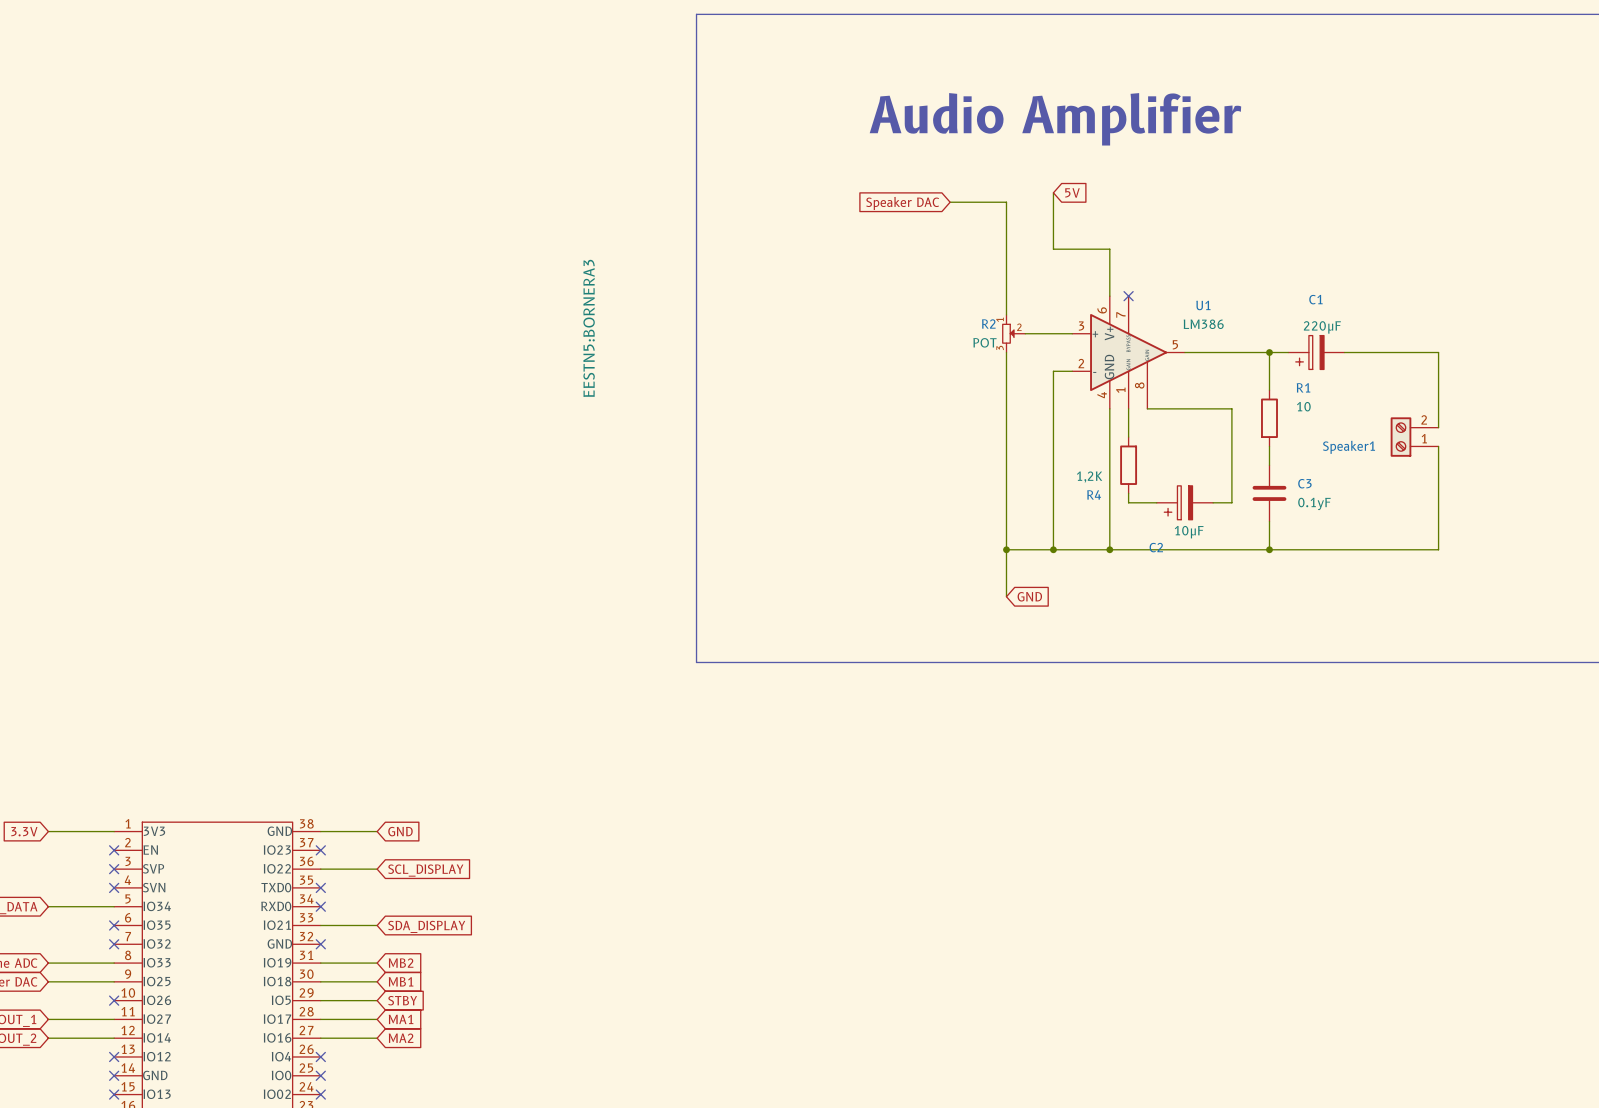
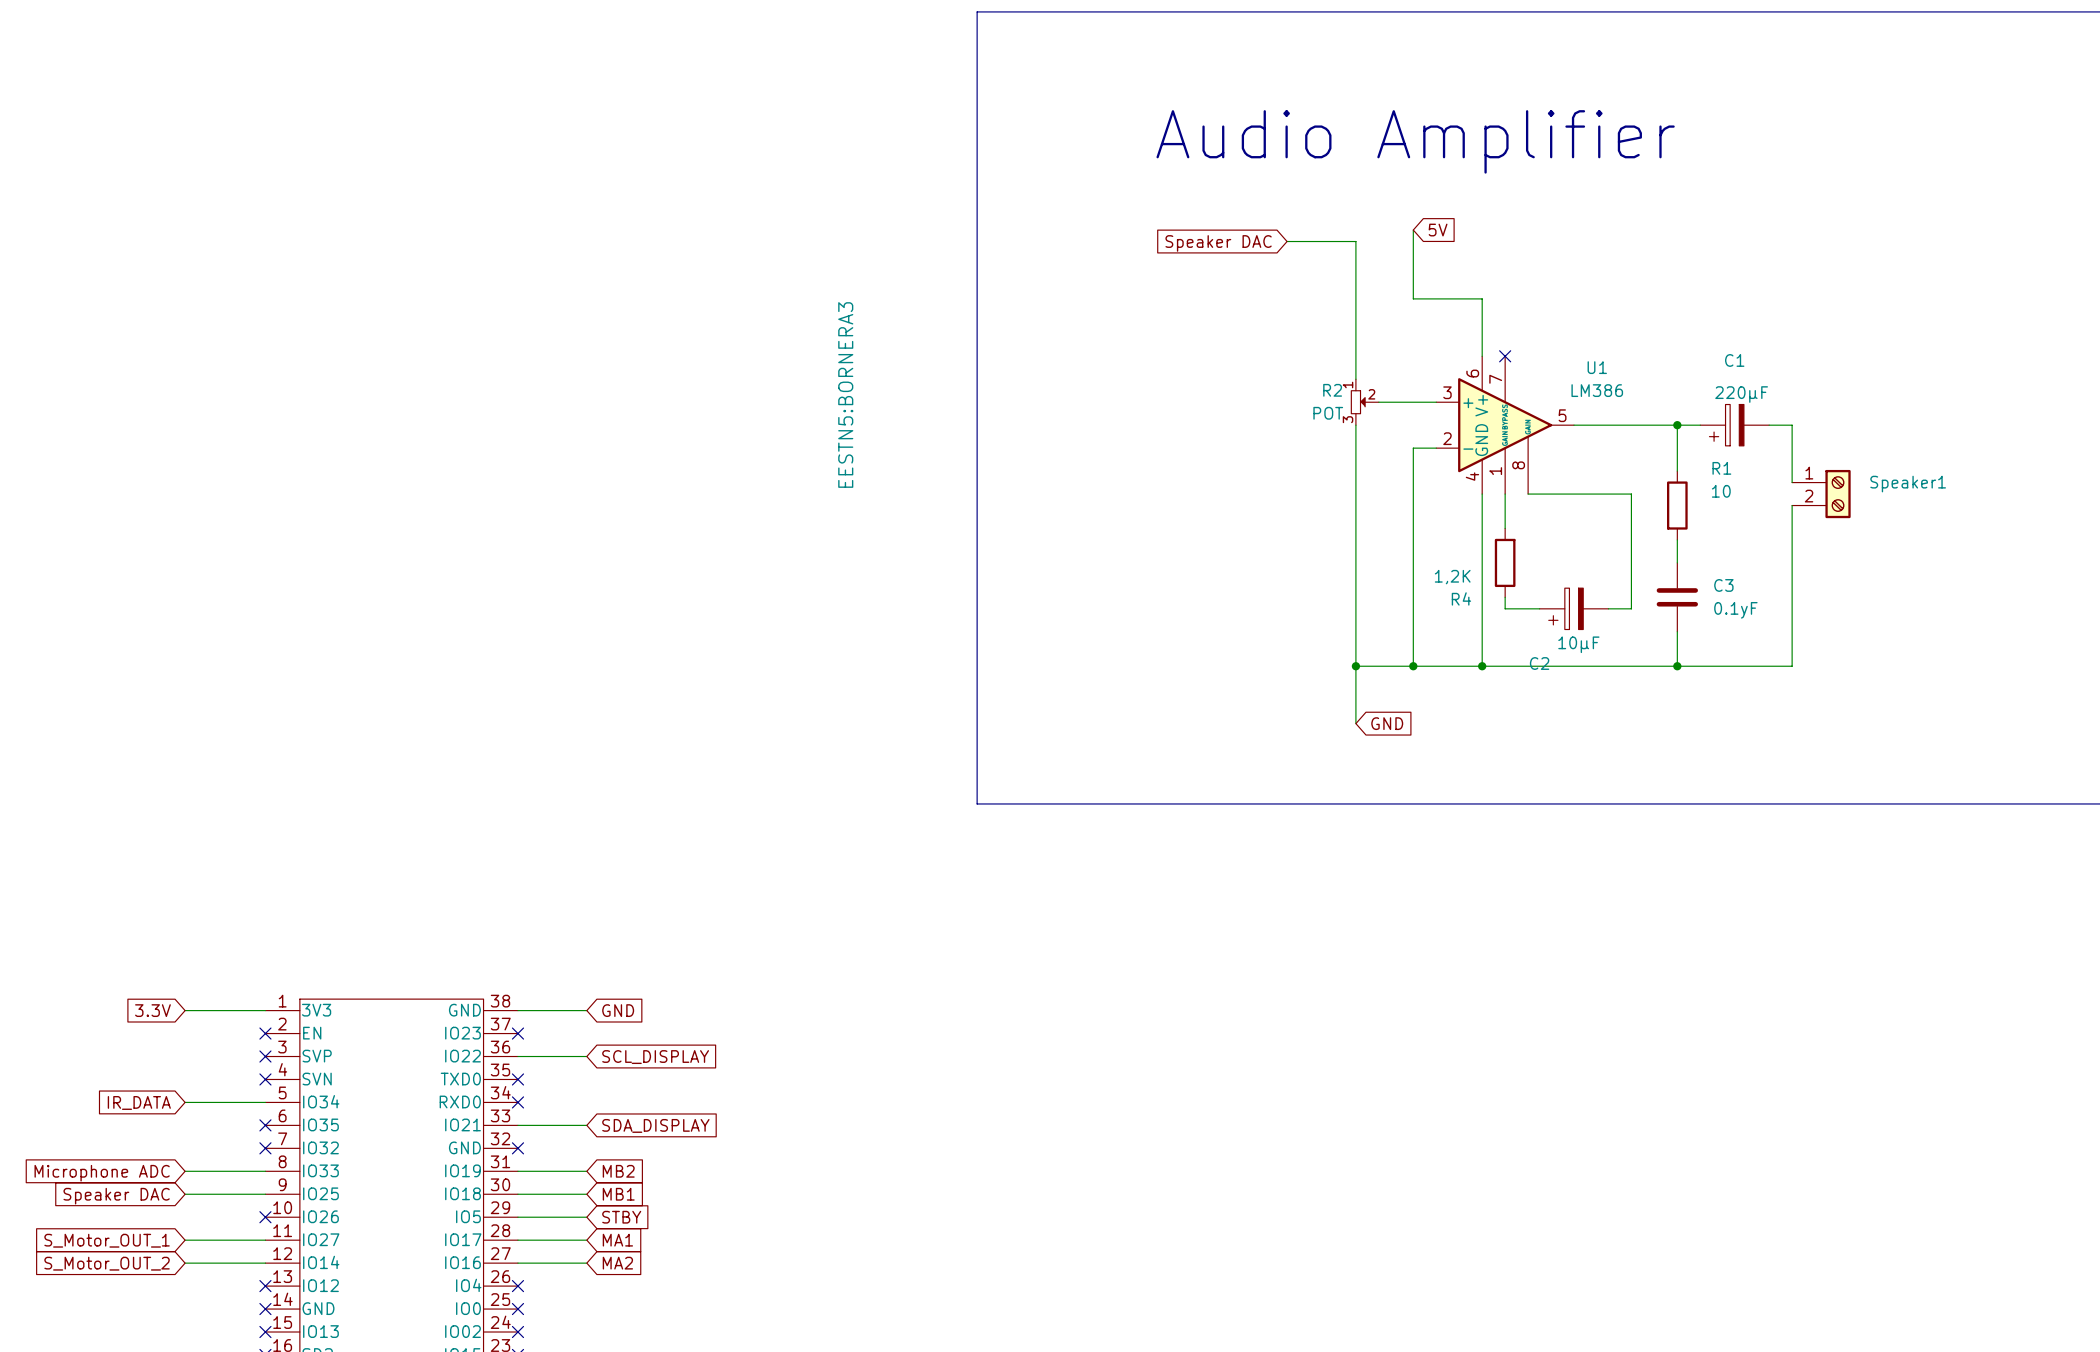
wire: (1363, 352) (1438, 352) (1438, 427) -> (1792, 425) (1792, 482)
Speaker1 rotation: 0° (1400, 437) -> 180° (1838, 494)
Speaker1 position: (1414, 437) -> (1821, 494)
wire: (1438, 446) (1438, 549) (1363, 549) -> (1792, 505) (1792, 666)

